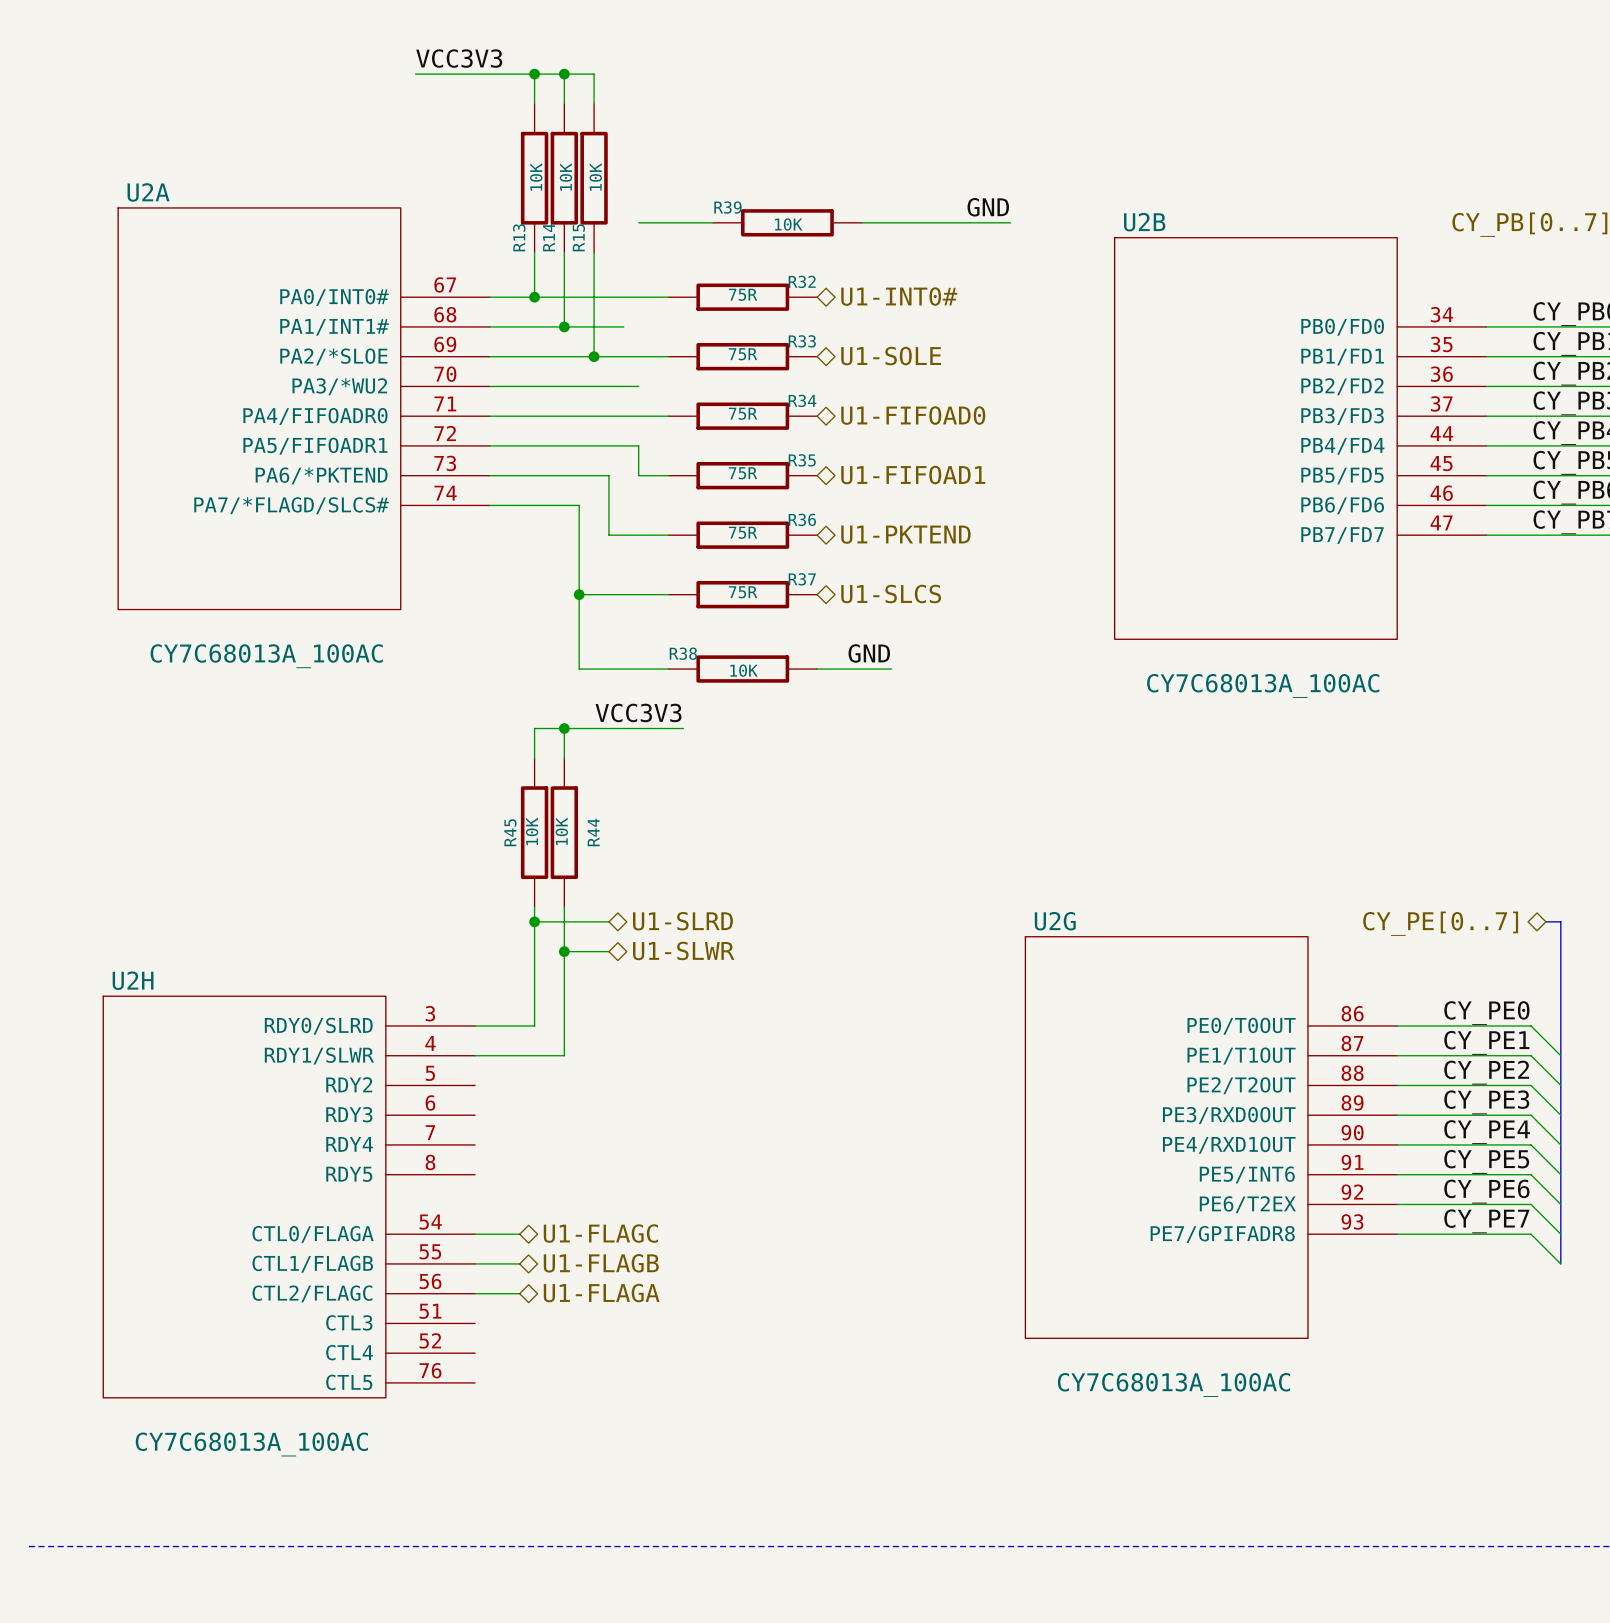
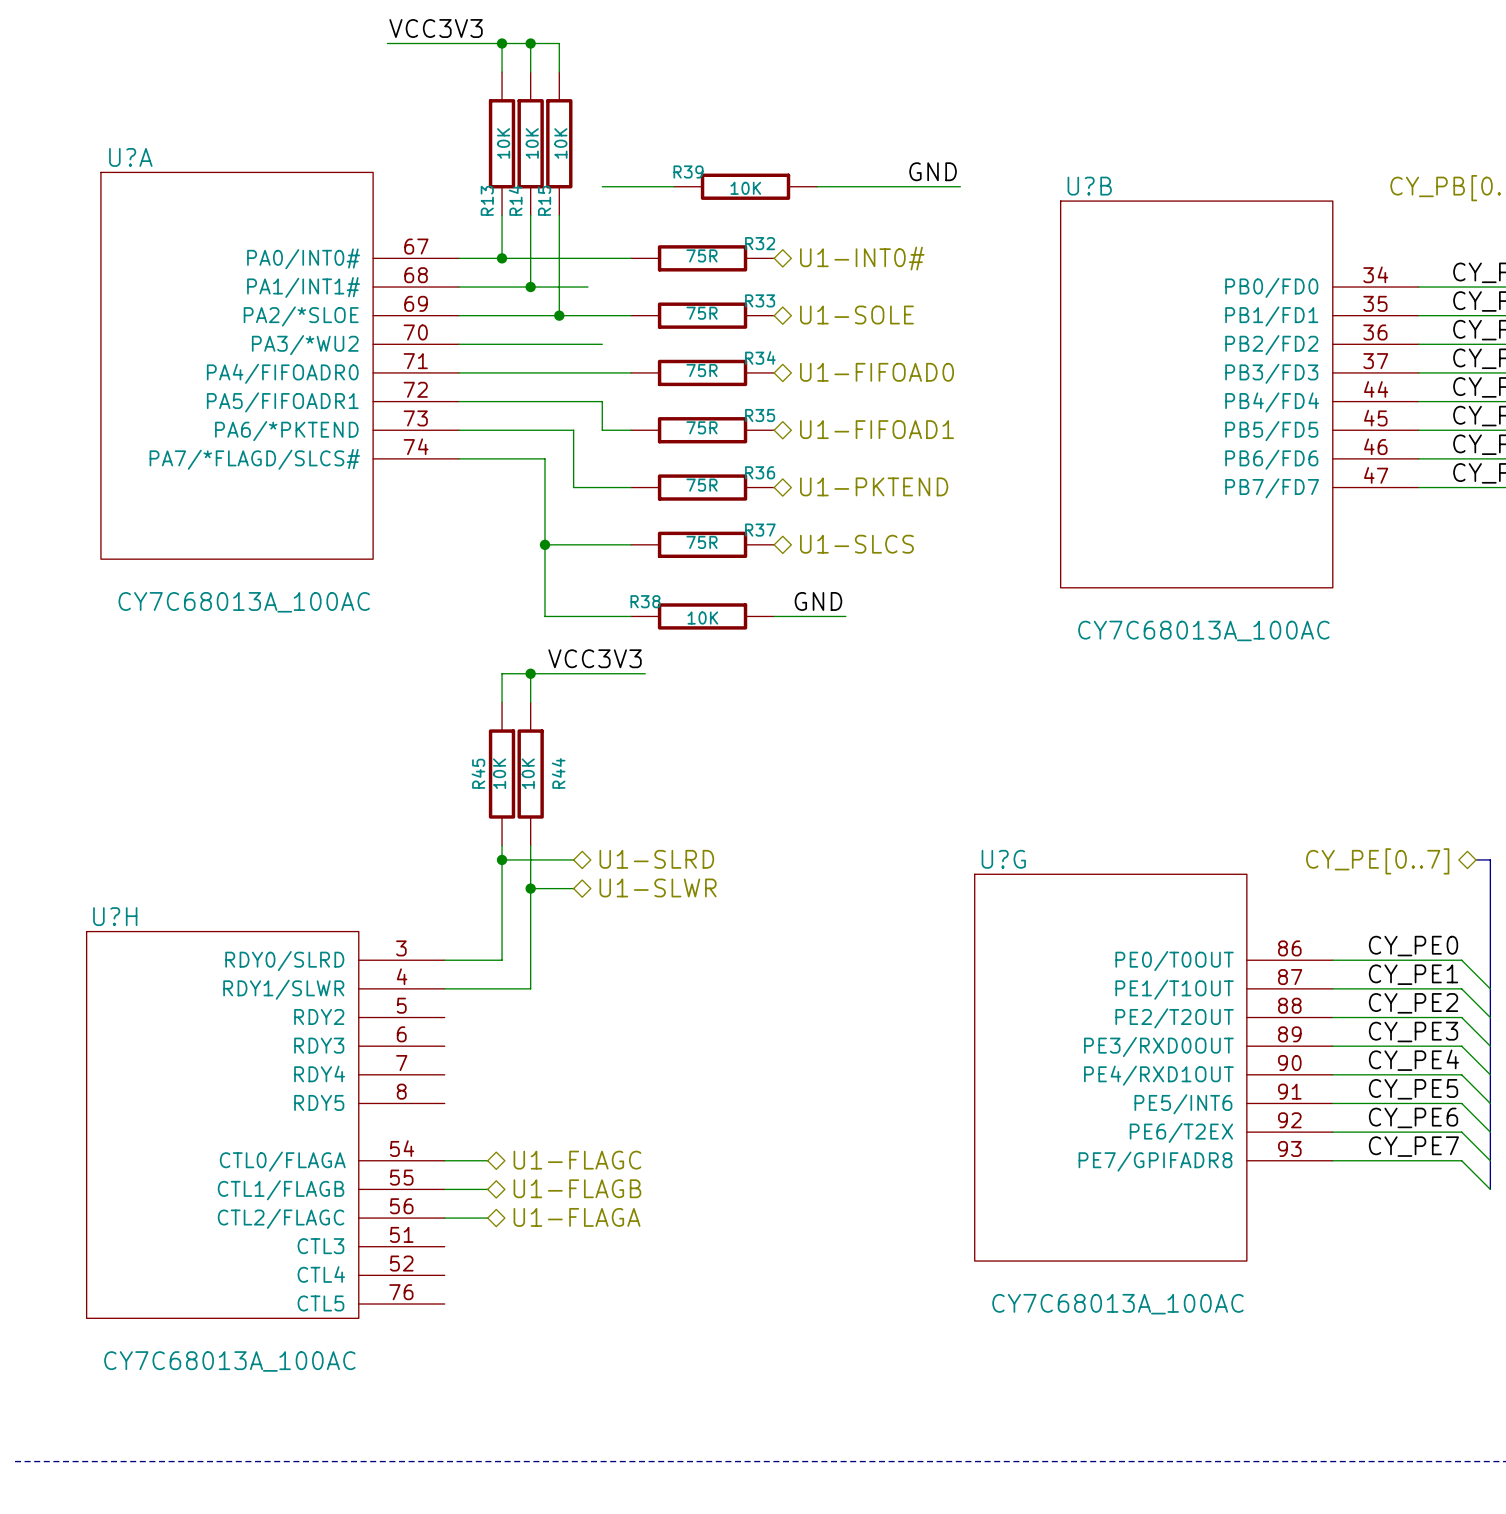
U2A name: U2A (148, 192) -> U?A (130, 157)
U2B name: U2B (1144, 222) -> U?B (1089, 186)
U2G name: U2G (1055, 921) -> U?G (1003, 859)
U2H name: U2H (133, 980) -> U?H (115, 916)

